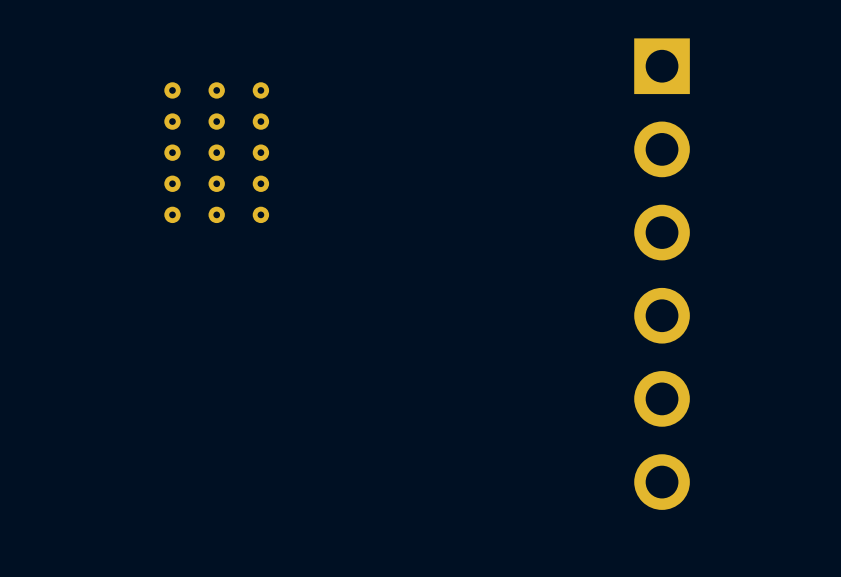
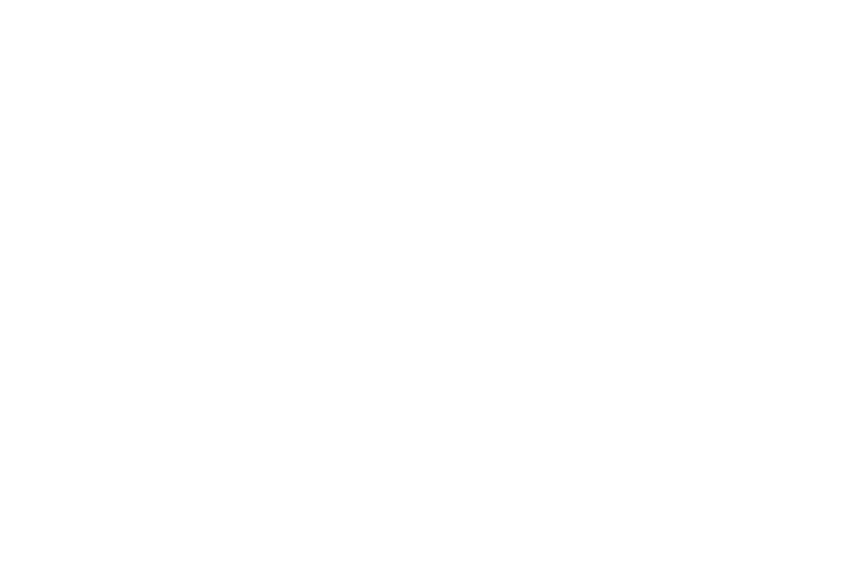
part: (216, 152) -> none
part: (662, 274) -> none

